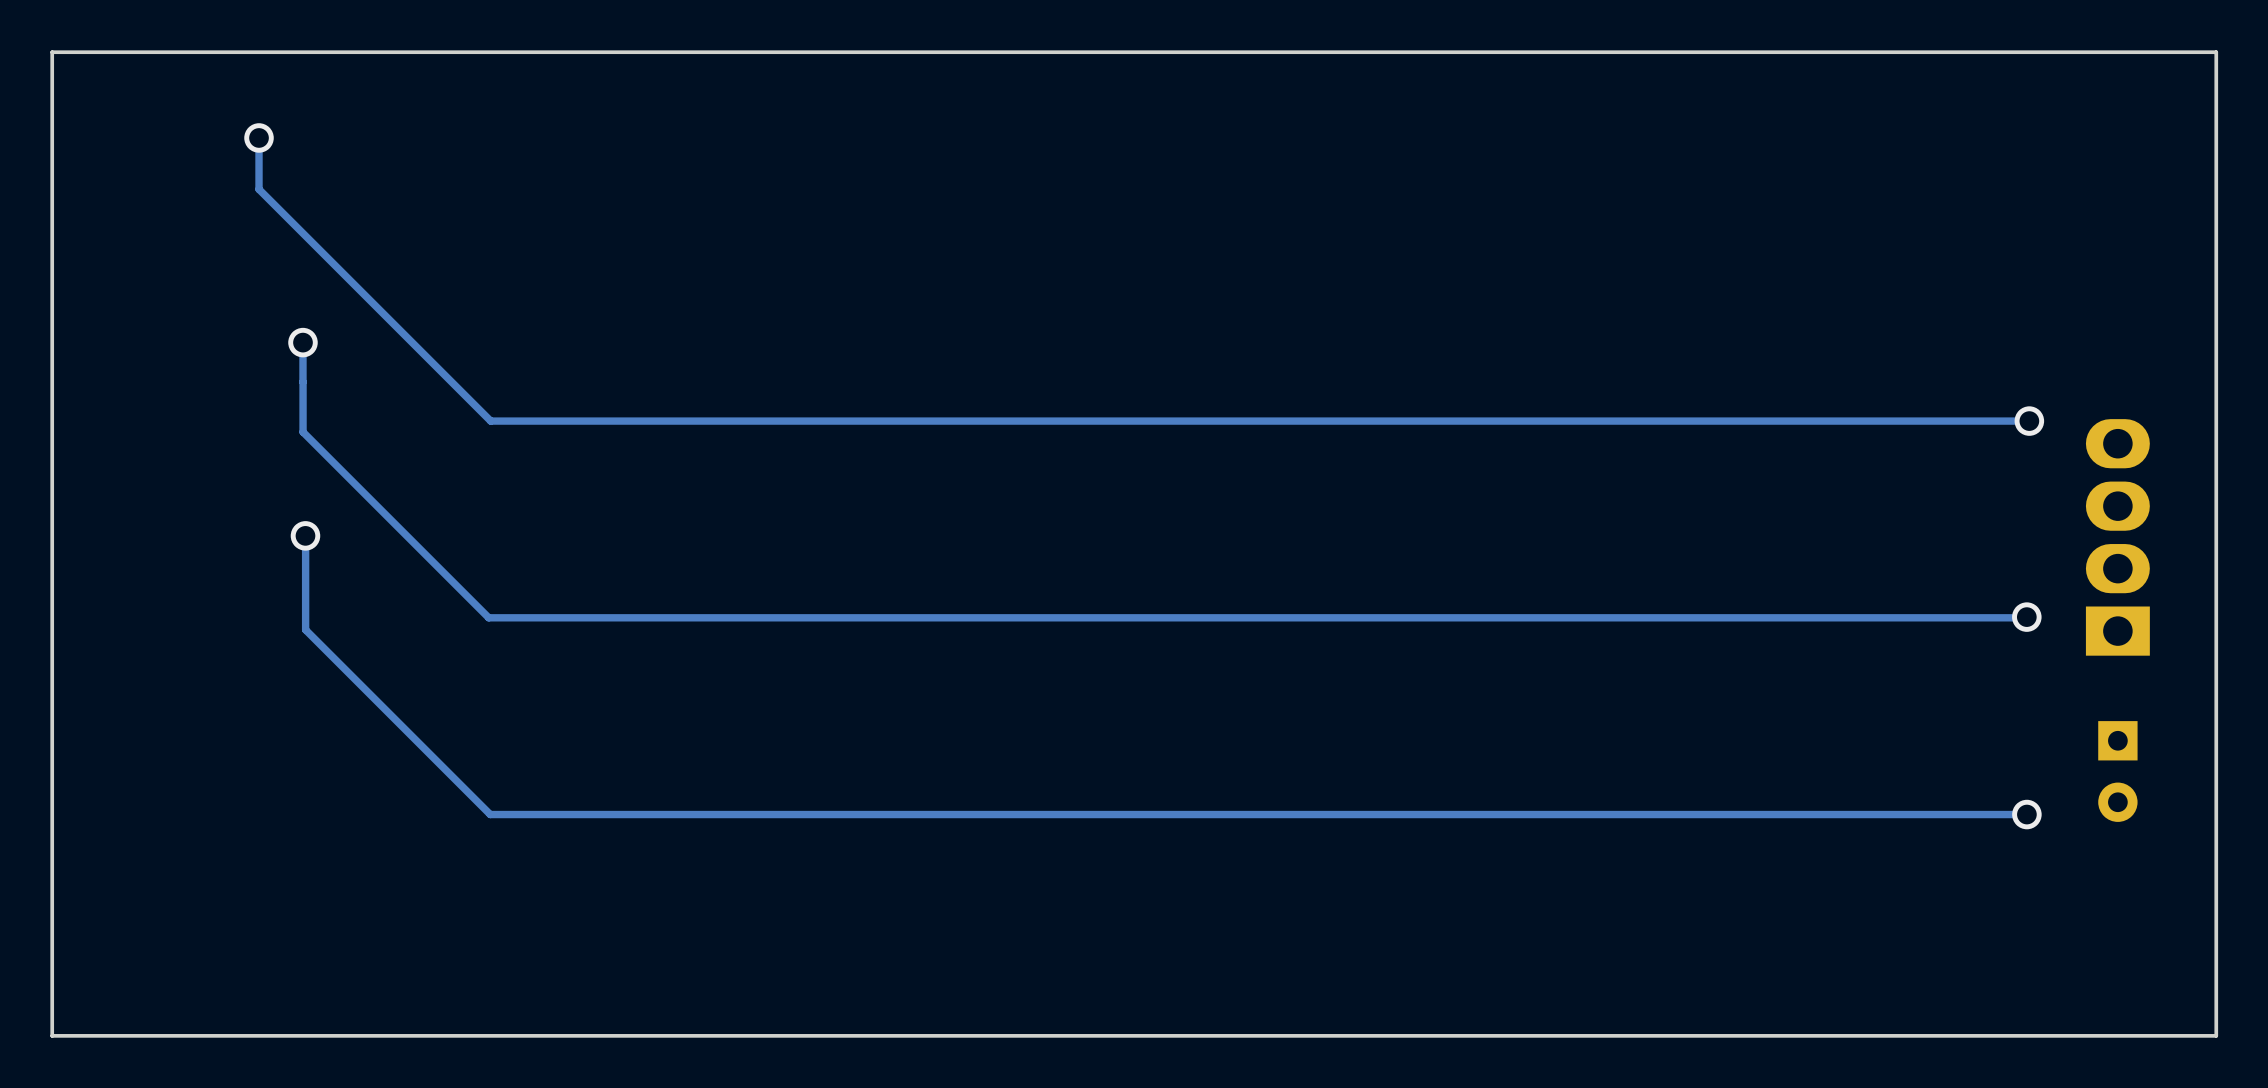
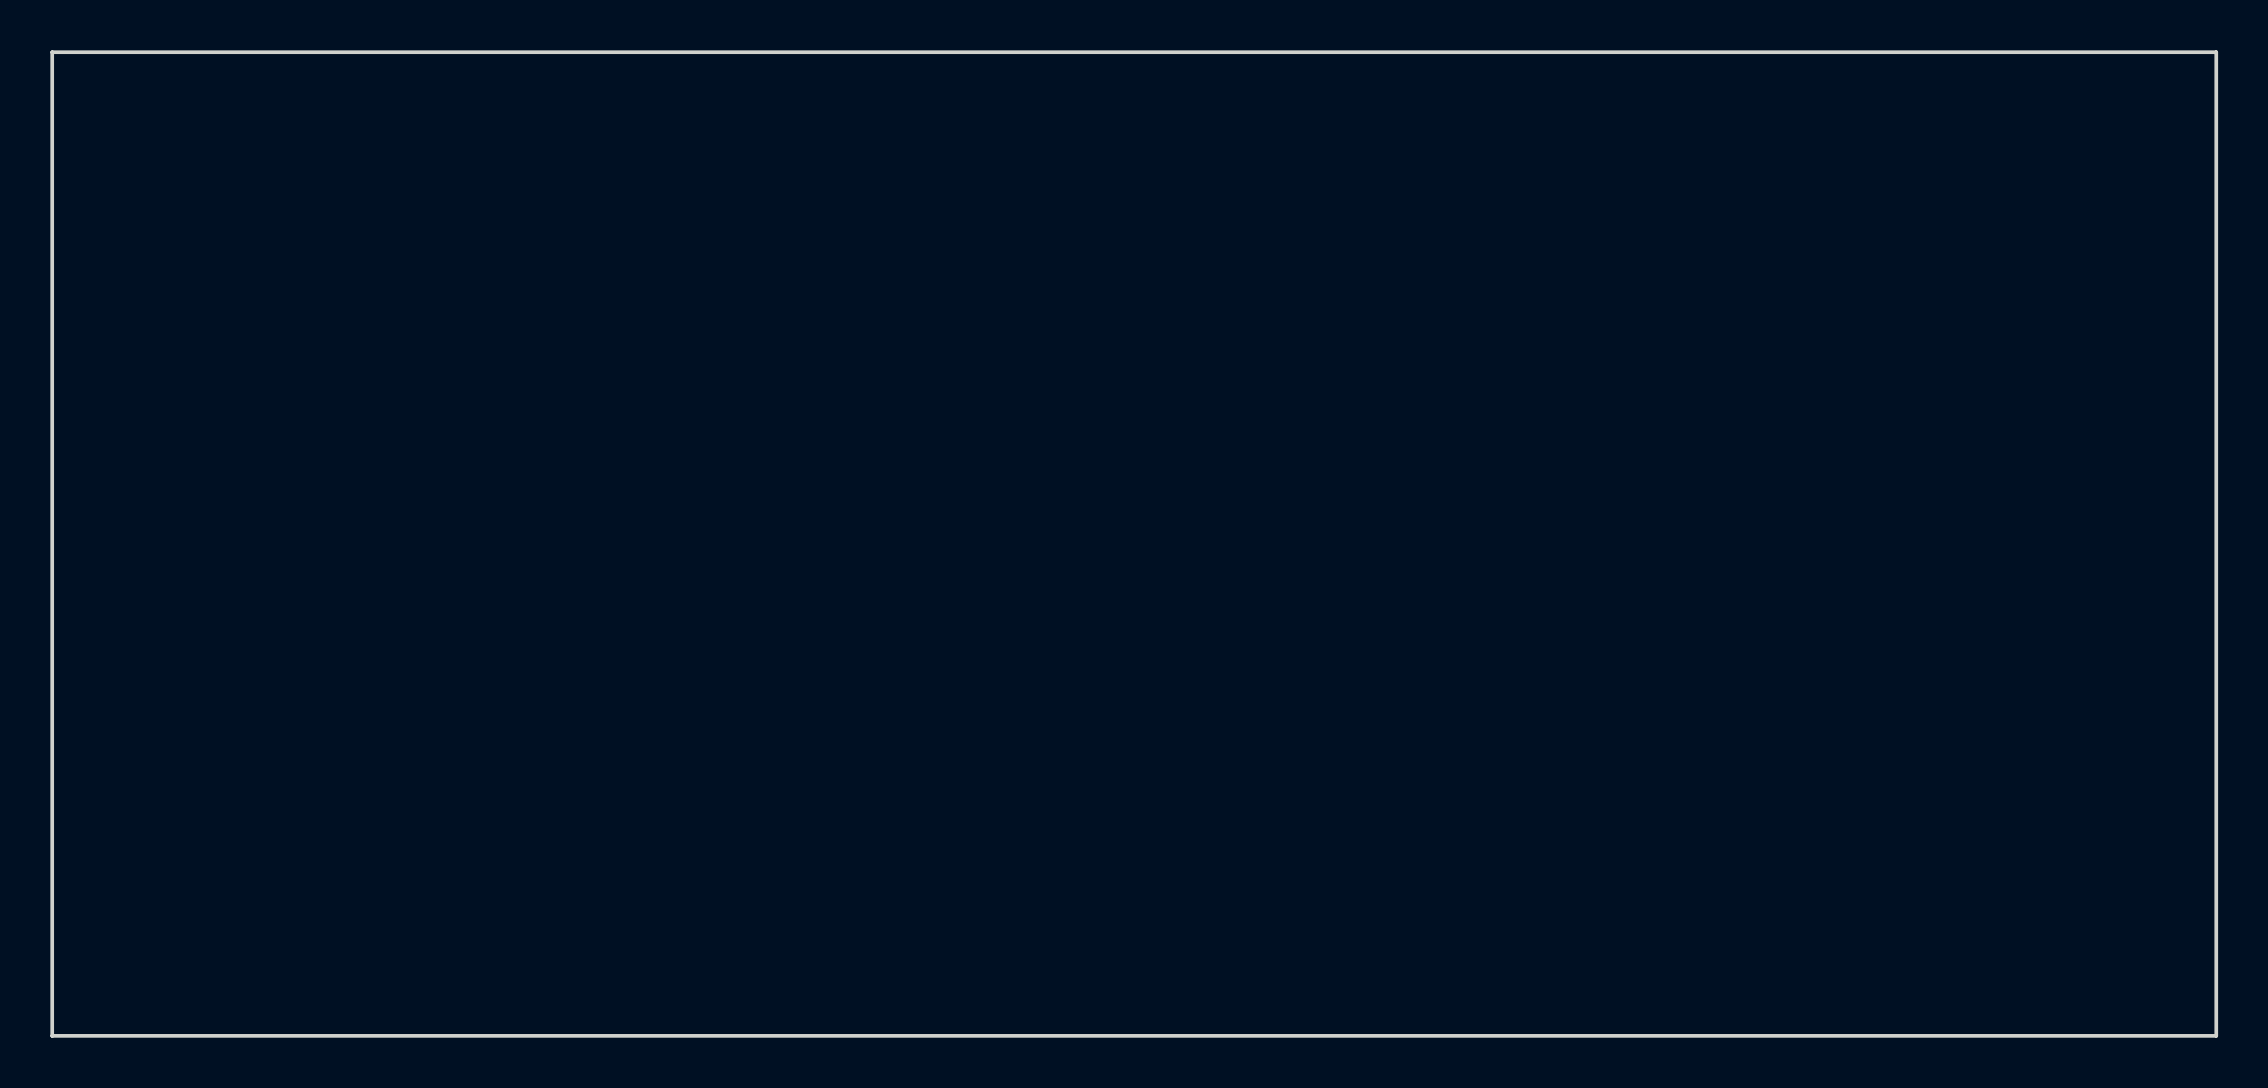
track: (259, 137) (259, 189) (490, 421) (2029, 421) -> none
via: (259, 137) -> none
track: (302, 342) (303, 432) (488, 617) (2026, 617) -> none
via: (302, 342) -> none
via: (2029, 421) -> none
via: (305, 535) -> none
track: (305, 536) (305, 629) (490, 814) (2026, 814) -> none
part: (2117, 537) -> none
via: (2026, 617) -> none
part: (2117, 771) -> none
via: (2026, 814) -> none

